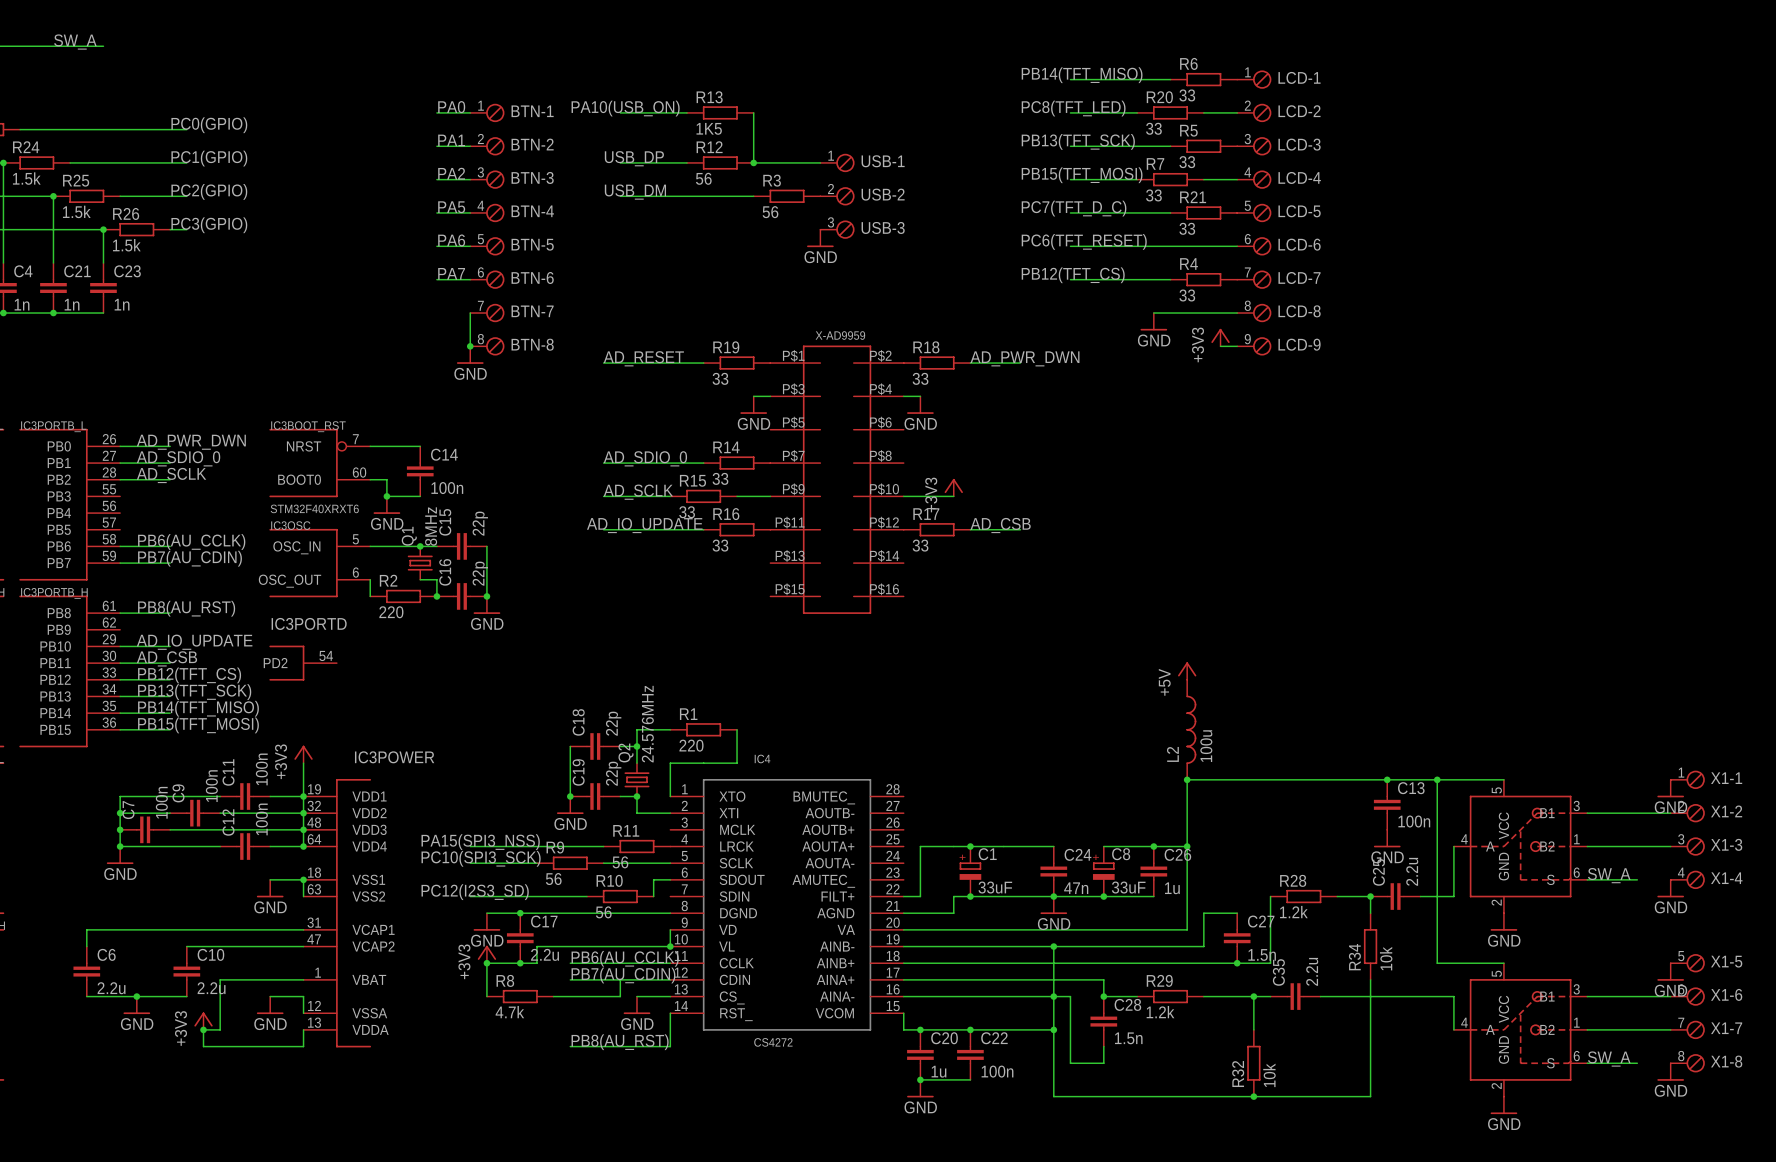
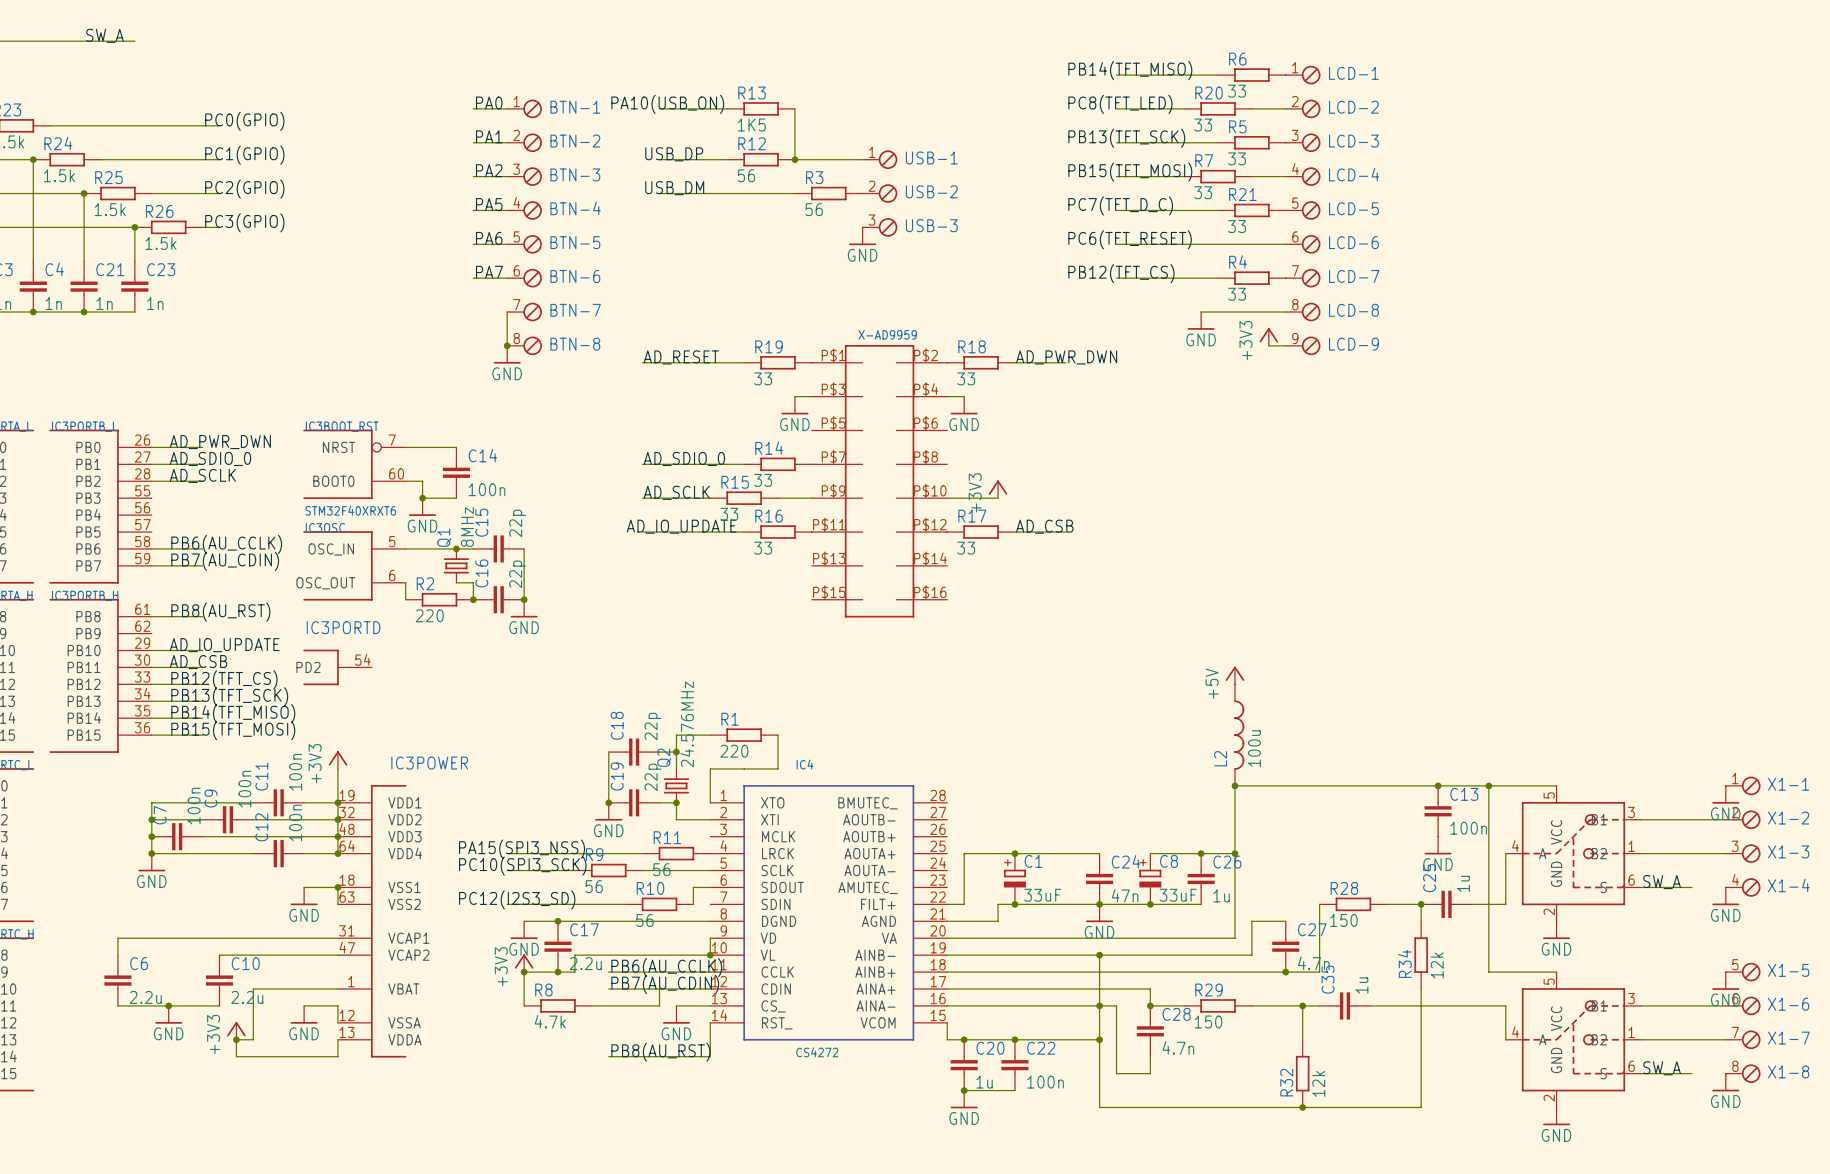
C25 value: 2.2u (1412, 871) -> 1u (1463, 883)
R28 value: 1.2k (1293, 912) -> 150 (1343, 920)
C27 value: 1.5n (1262, 954) -> 4.7n (1313, 963)
R34 value: 10k (1386, 958) -> 12k (1437, 965)
C35 value: 2.2u (1312, 971) -> 1u (1361, 985)
R29 value: 1.2k (1160, 1012) -> 150 (1208, 1022)
C28 value: 1.5n (1128, 1038) -> 4.7n (1178, 1047)
R32 value: 10k (1269, 1075) -> 12k (1318, 1083)

